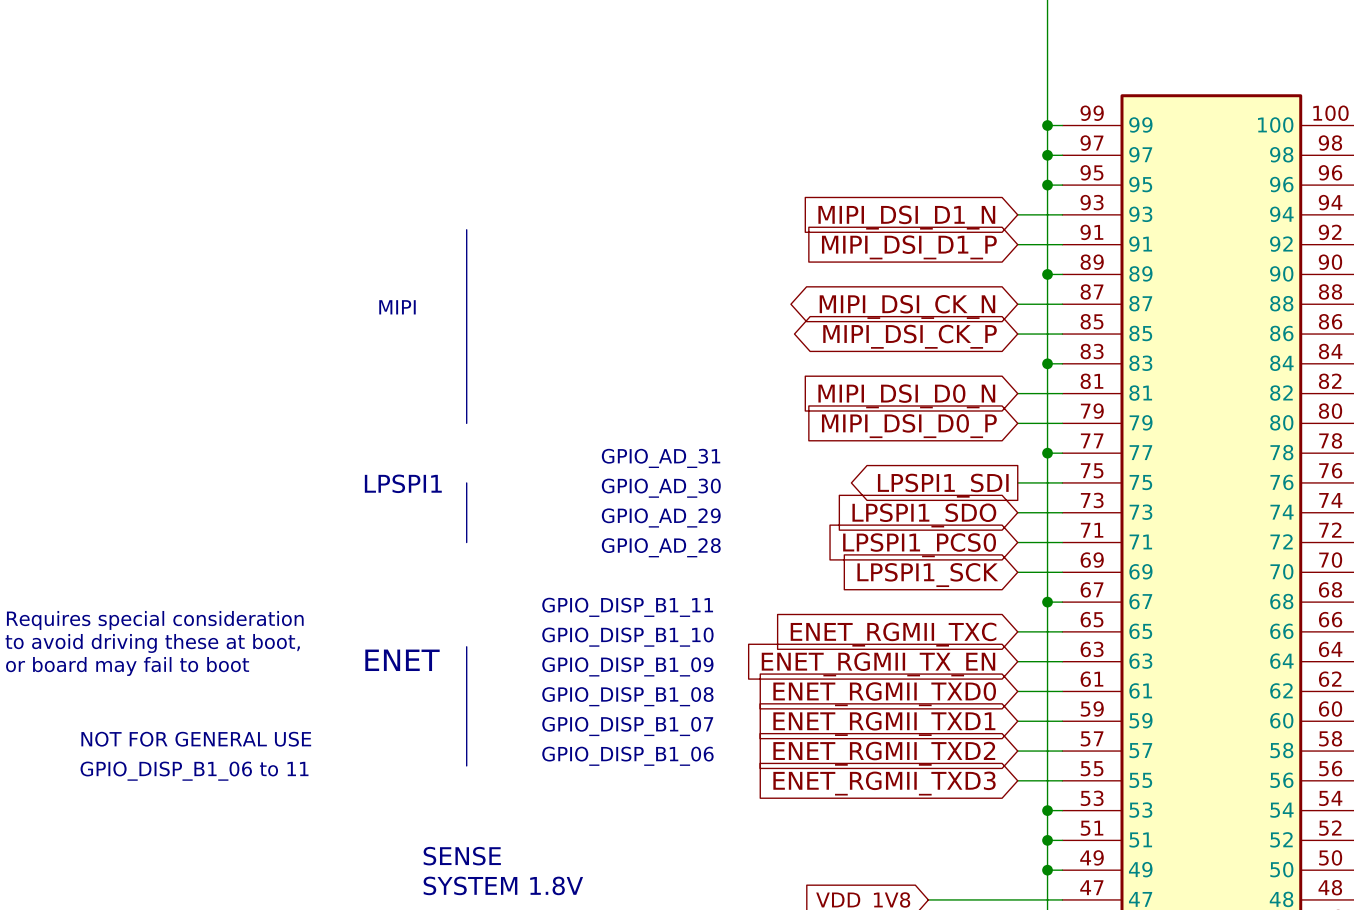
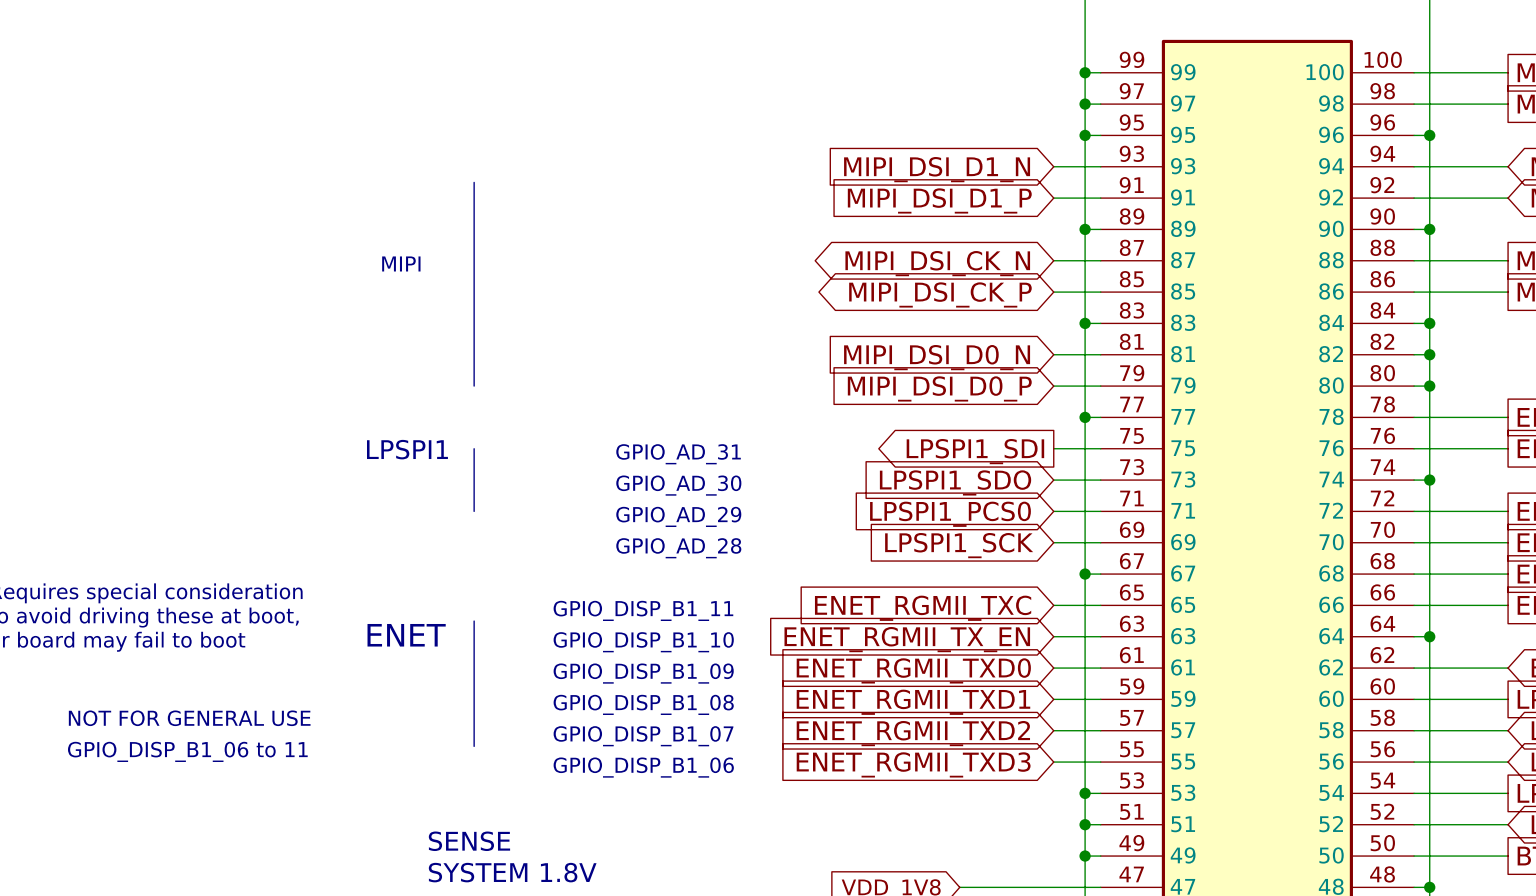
text: GPIO_AD_31 (661, 458) -> none
text: GPIO_AD_30 (661, 488) -> GPIO_AD_31 (678, 454)
text: GPIO_AD_29 (661, 517) -> GPIO_AD_30 (678, 485)
text: GPIO_AD_28 (661, 547) -> GPIO_AD_29 (678, 516)
text: none -> GPIO_AD_28 (678, 548)
text: GPIO_DISP_B1_11 (627, 607) -> none
text: GPIO_DISP_B1_10 (627, 637) -> GPIO_DISP_B1_11 (643, 610)
text: GPIO_DISP_B1_09 (627, 666) -> GPIO_DISP_B1_10 (643, 642)
text: GPIO_DISP_B1_08 (627, 696) -> GPIO_DISP_B1_09 (643, 673)
text: GPIO_DISP_B1_07 (627, 726) -> GPIO_DISP_B1_08 (643, 704)
text: GPIO_DISP_B1_06 (627, 756) -> GPIO_DISP_B1_07 (643, 736)
text: none -> GPIO_DISP_B1_06 (643, 767)

